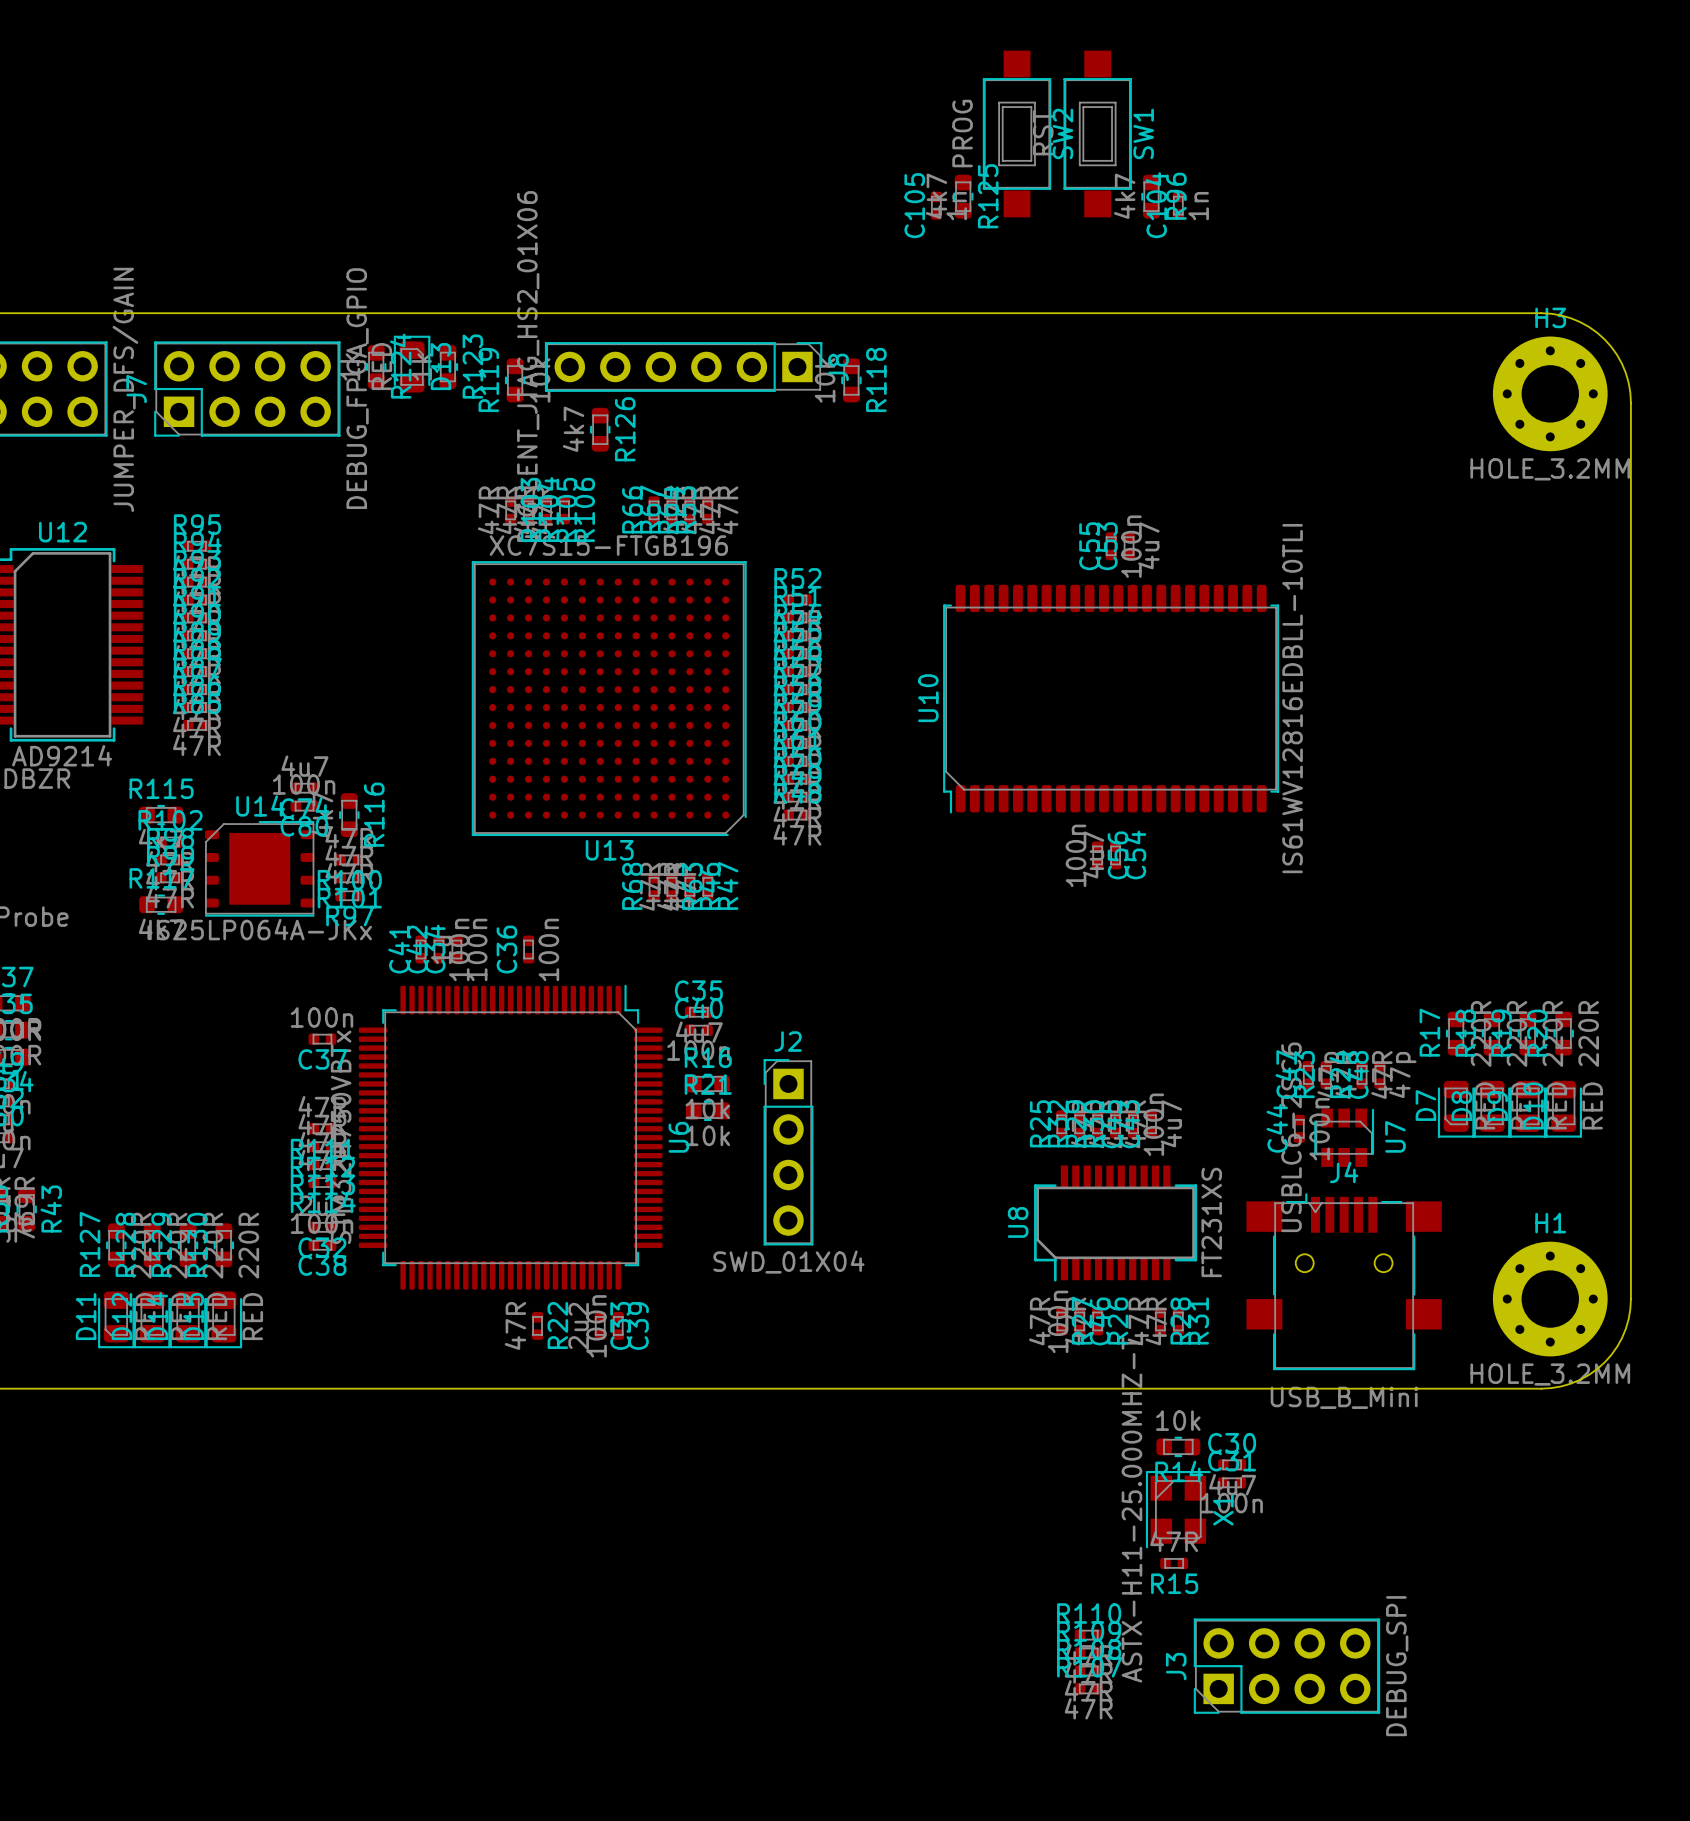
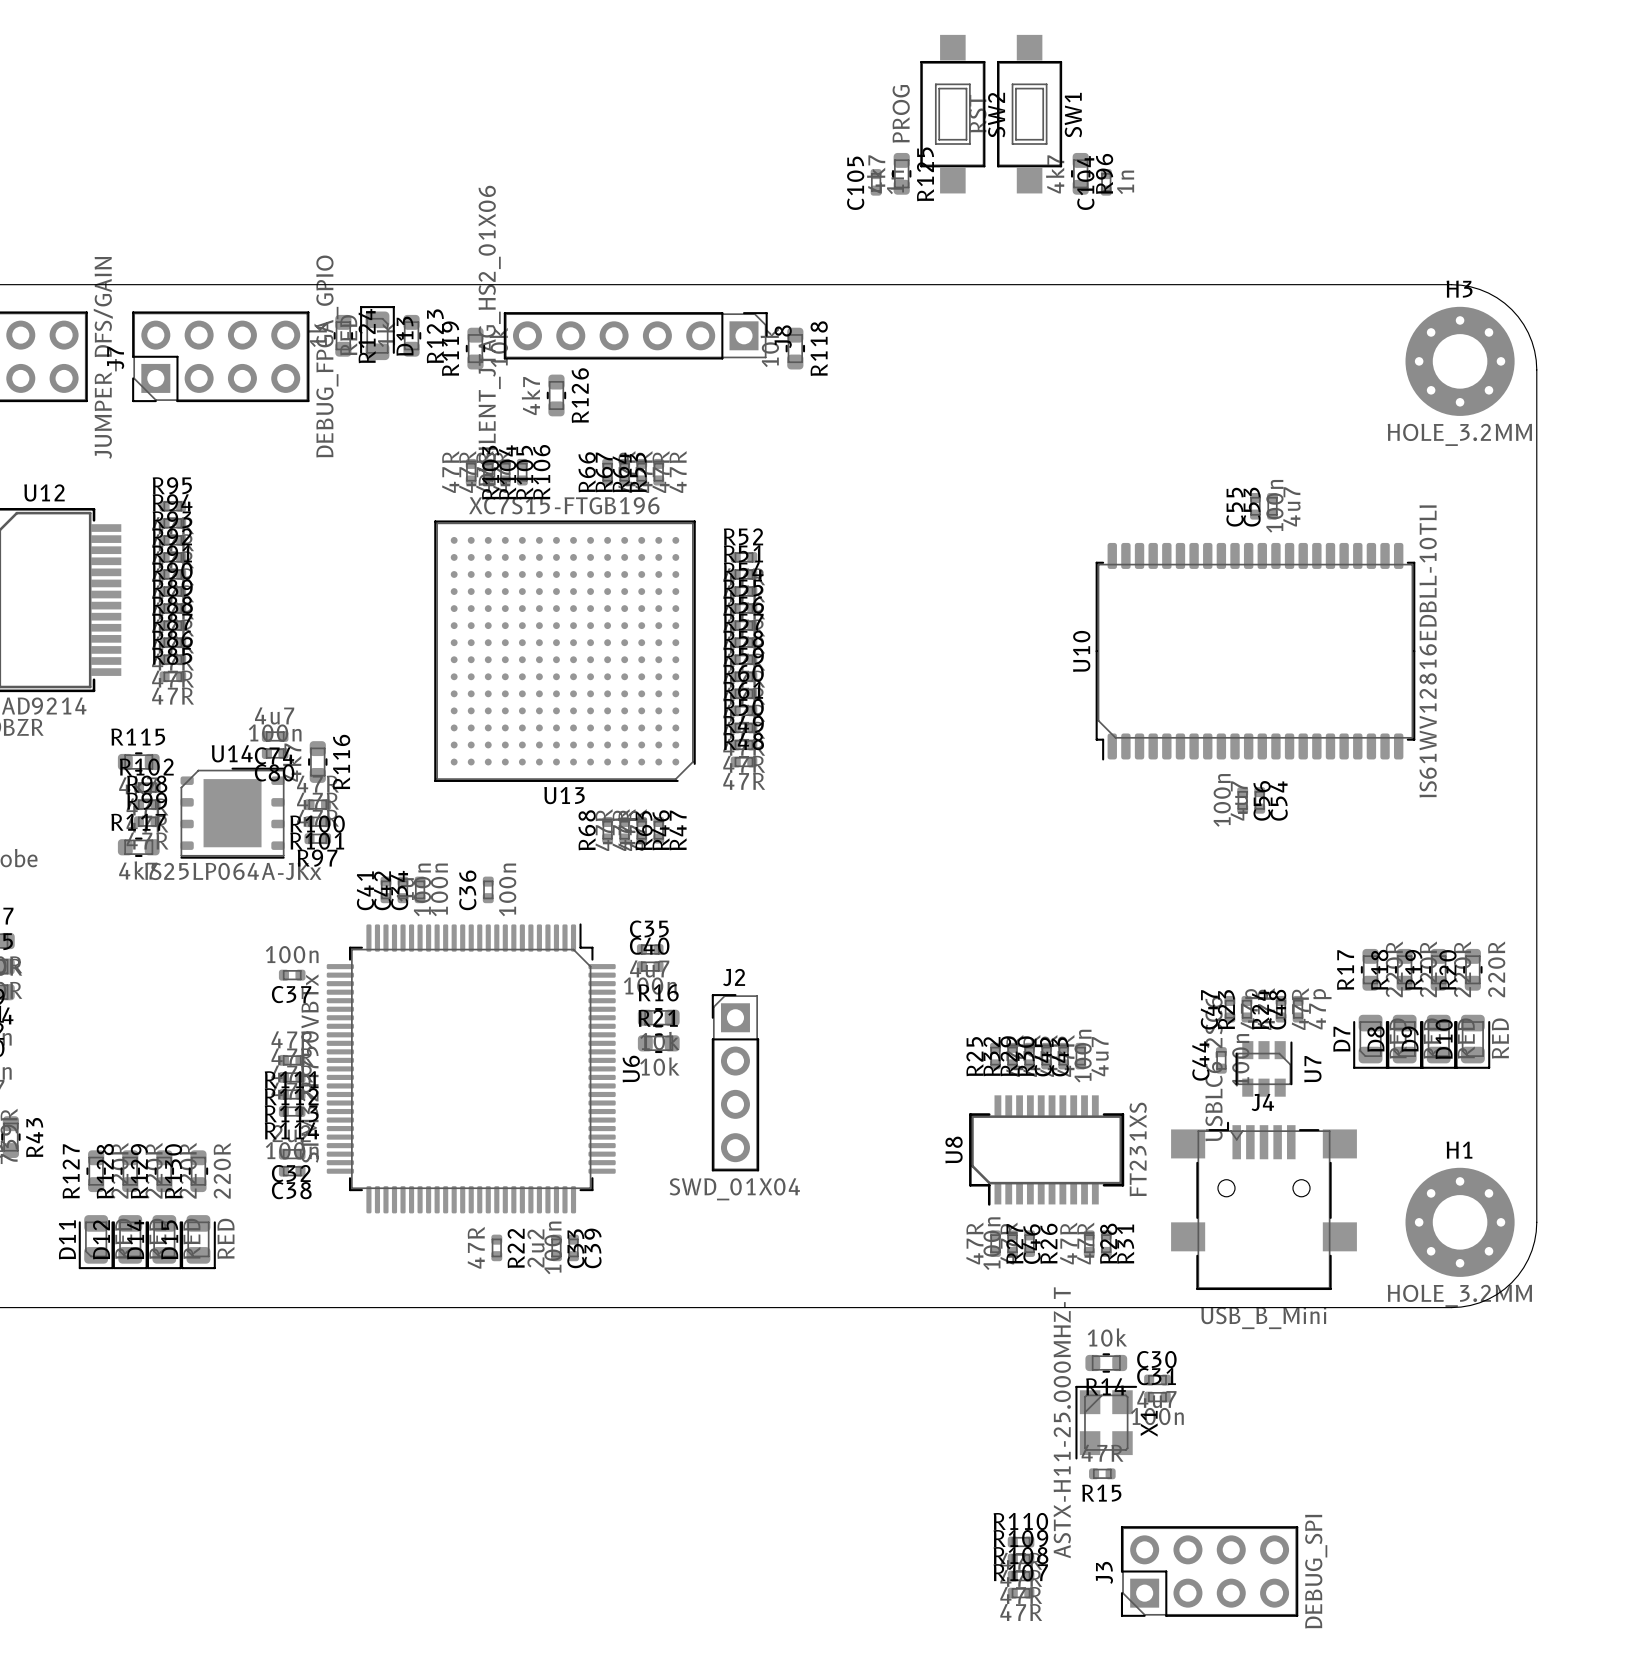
C55 position: (1111, 546) -> (1255, 506)
C53 position: (1129, 546) -> (1272, 506)
U10 position: (1111, 699) -> (1255, 651)
C56 position: (1097, 855) -> (1242, 800)
C54 position: (1115, 855) -> (1259, 800)

